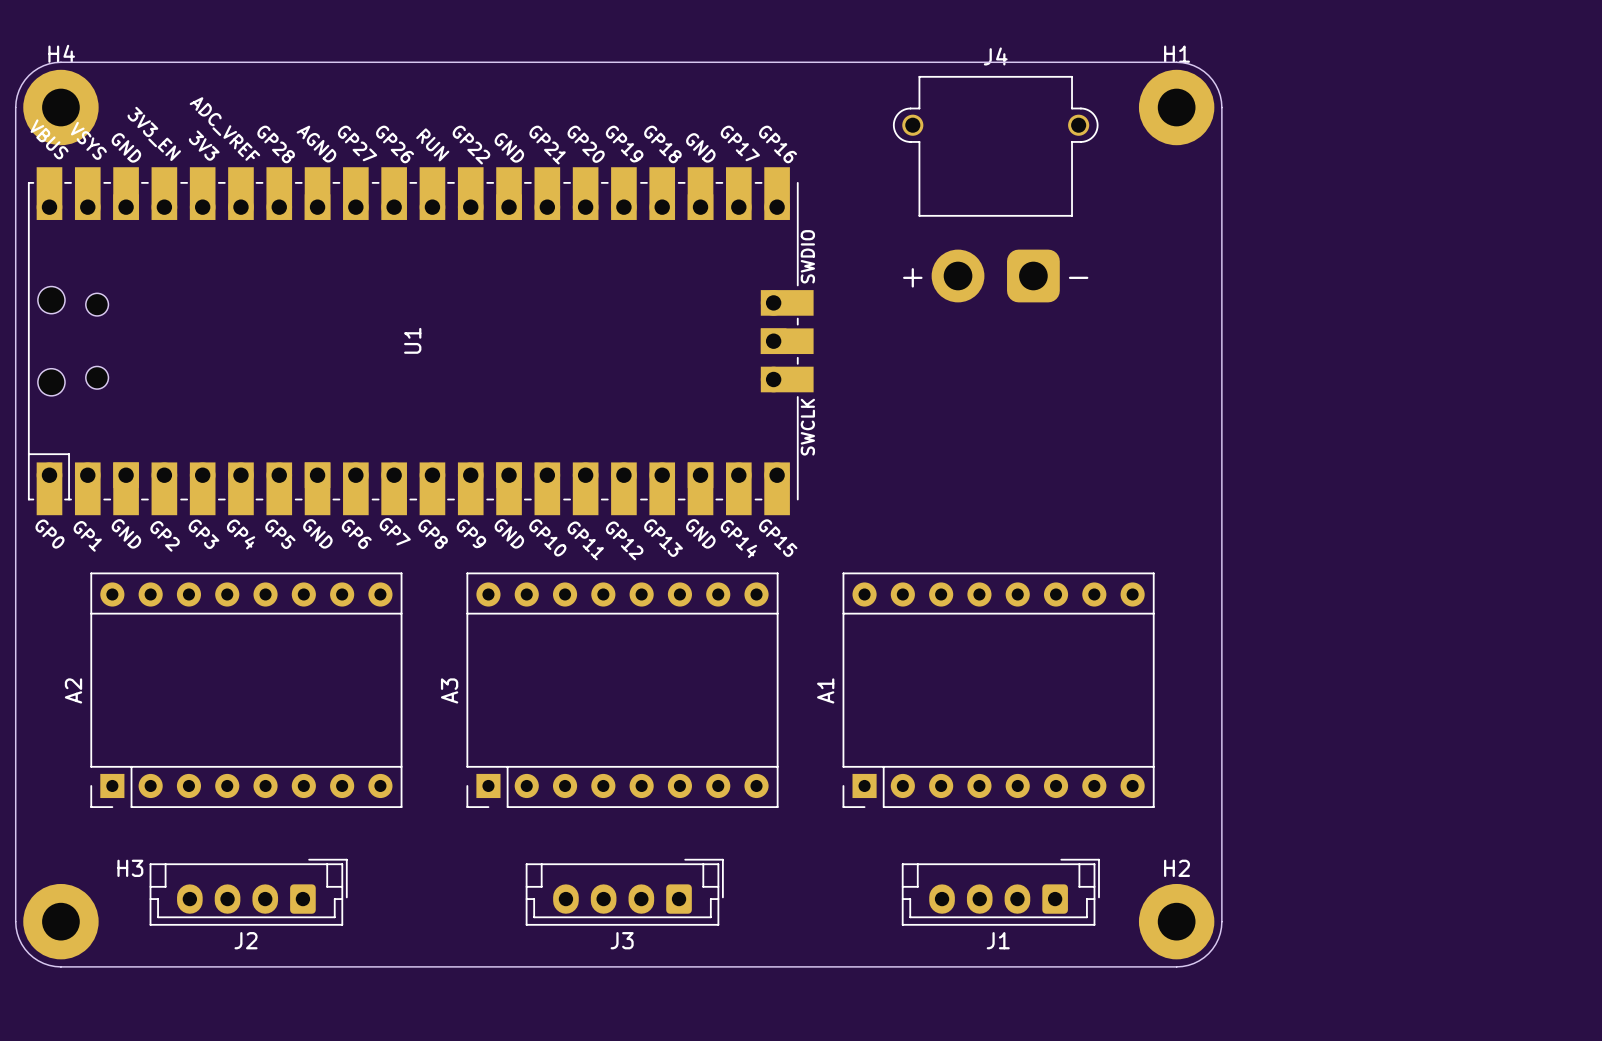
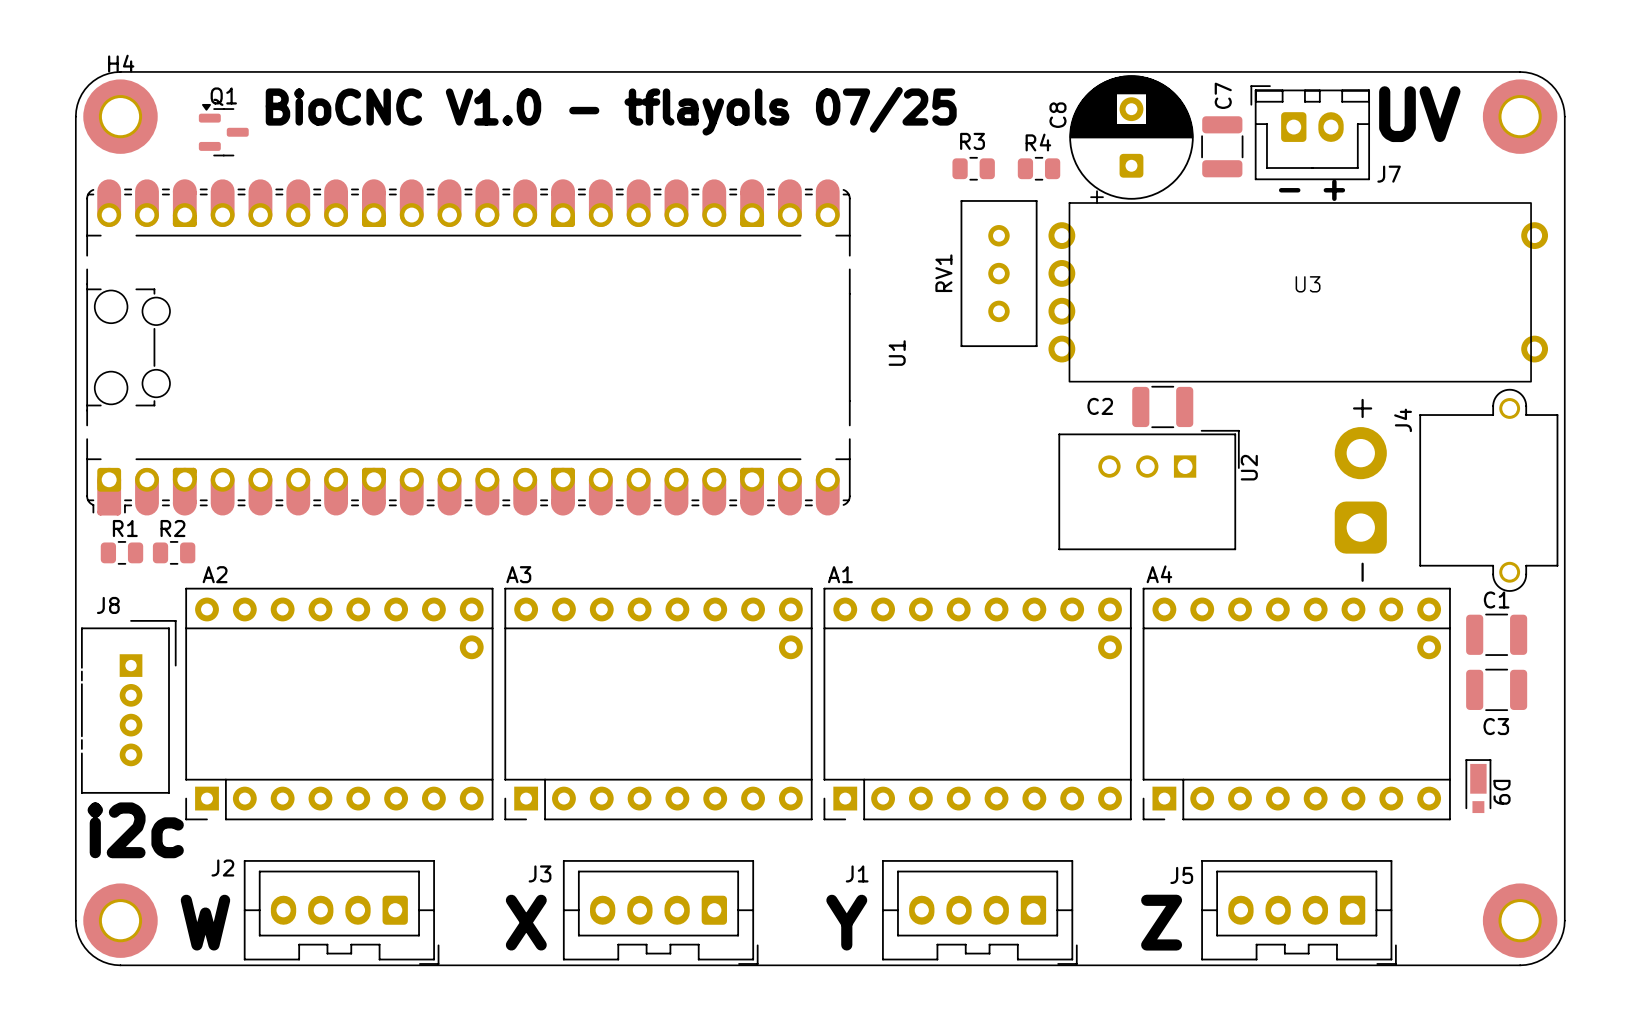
J4 name position: J4 (995, 56) -> J4 (1403, 420)
board edge: (1176, 62) (1193, 65) (1208, 75) (1218, 90) (1221, 107) (1221, 921) (1218, 938) (1208, 953) (1193, 963) (1176, 966) -> (1222, 71) (1525, 72) (1542, 77) (1551, 85) (1561, 99) (1564, 116) (1564, 920) (1561, 937) (1555, 947) (1547, 956) (1537, 961) (1525, 964) (1222, 965)
text: none -> BioCNC V1.0 - tflayols 07/25 (611, 111)
text: none -> UV (1419, 114)
H1: (1176, 107) -> none
part: none -> (1520, 116)
Q1: none -> (223, 130)
J7: none -> (1310, 132)
C8: none -> (1131, 139)
C7: none -> (1222, 146)
R3: none -> (973, 168)
R4: none -> (1039, 168)
U1 footprint: [27, 167, 814, 516] -> [86, 179, 851, 516]
text: none -> - + (1312, 190)
J4 rotation: 0° (995, 189) -> 90° clockwise (1446, 490)
J4 position: (995, 189) -> (1446, 490)
RV1: none -> (999, 273)
U3: none -> (1298, 292)
U1 name position: U1 (412, 340) -> U1 (897, 353)
C2: none -> (1162, 406)
U2: none -> (1149, 490)
R1: none -> (121, 552)
R2: none -> (174, 552)
A2 footprint: [90, 572, 403, 808] -> [185, 587, 494, 821]
A3 footprint: [466, 572, 779, 808] -> [504, 587, 813, 821]
A1 footprint: [842, 572, 1155, 808] -> [823, 587, 1132, 821]
C1: none -> (1496, 634)
C3: none -> (1496, 689)
A2 name position: A2 (73, 690) -> A2 (215, 574)
A3 name position: A3 (449, 690) -> A3 (518, 574)
A1 name position: A1 (825, 690) -> A1 (840, 574)
A4: none -> (1296, 704)
J8: none -> (128, 706)
D9: none -> (1478, 786)
text: none -> i2c (135, 830)
J2 footprint: [149, 858, 348, 926] -> [243, 860, 440, 965]
J3 footprint: [525, 858, 724, 926] -> [562, 860, 759, 965]
J1 footprint: [901, 858, 1100, 926] -> [882, 860, 1078, 965]
H3 name: H3 (130, 868) -> none
J5: none -> (1298, 912)
H2: (1176, 921) -> none
part: none -> (1520, 920)
text: none -> W (205, 922)
text: none -> X (526, 922)
text: none -> Y (846, 922)
text: none -> Z (1161, 922)
J2 name position: J2 (246, 940) -> J2 (222, 867)
J3 name position: J3 (622, 940) -> J3 (540, 873)
J1 name position: J1 (998, 940) -> J1 (857, 873)

